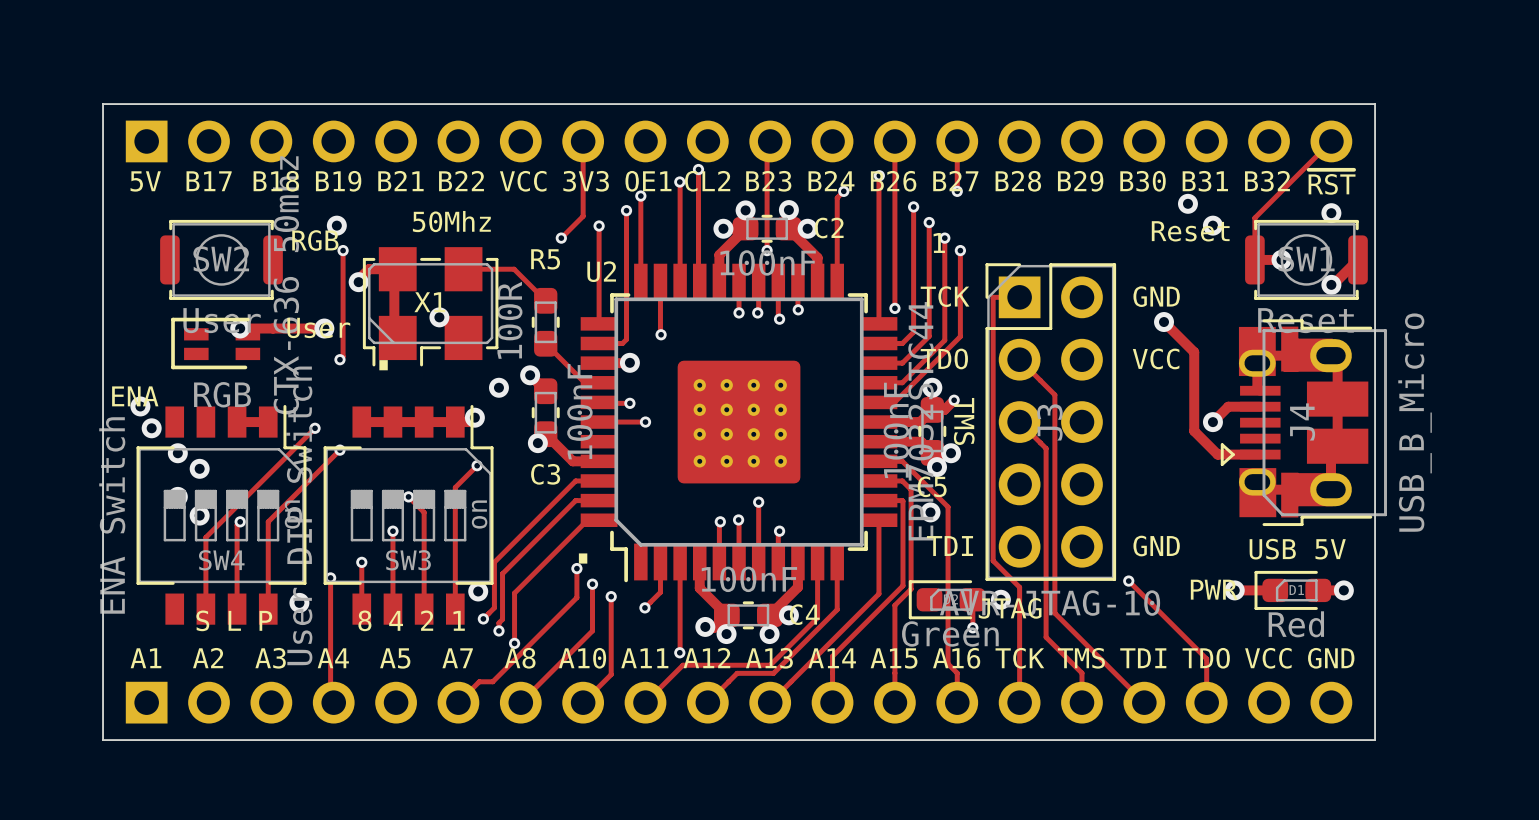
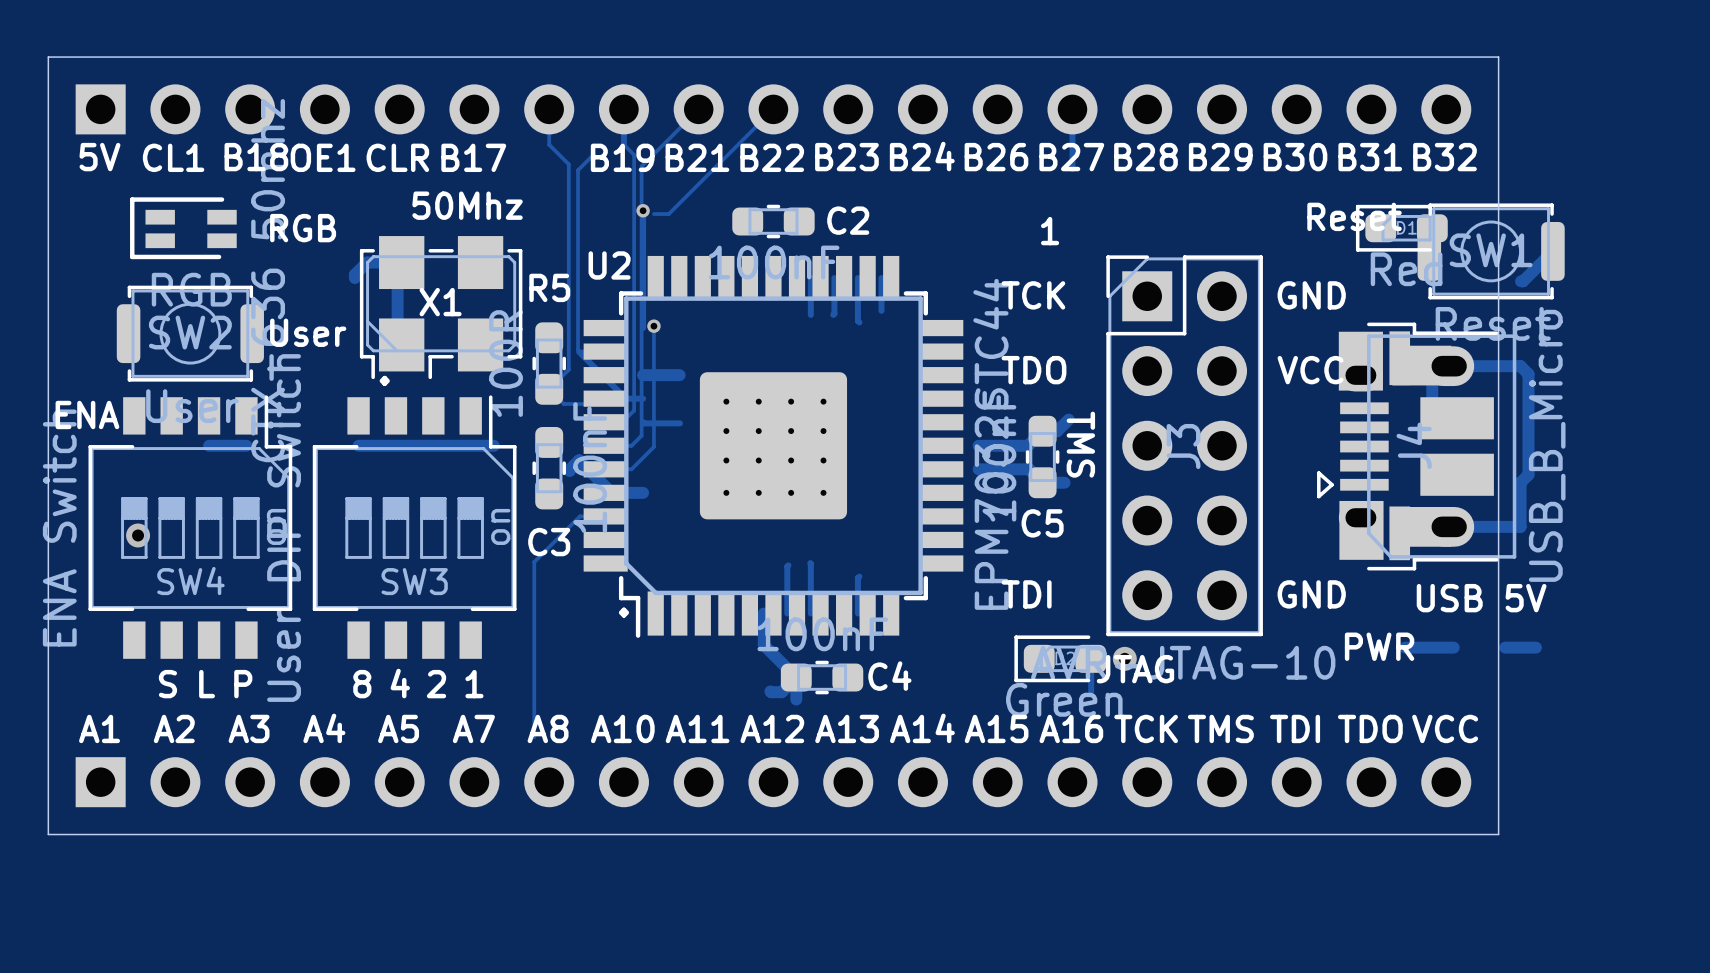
board edge: (103, 104) (1375, 104) (1375, 740) (103, 740) -> (48, 64) (48, 57) (1498, 57) (1498, 834) (48, 834) (48, 827)
track: none -> (549, 109) (549, 144) (568, 164) (568, 369) (549, 389) (563, 403) (600, 403) (605, 398)
track: none -> (698, 109) (641, 166) (641, 435) (631, 445) (605, 445)
track: none -> (773, 109) (668, 214) (653, 214)
part: none -> (773, 109)
part: (739, 141) -> none
track: (770, 141) (767, 144) (767, 250) -> none
track: (894, 141) (894, 308) -> none
track: (1331, 141) (1254, 217) (1254, 259) (1281, 259) -> none
track: (698, 169) (699, 282) -> none
via: (698, 169) -> none
track: (583, 170) (583, 216) (561, 238) -> (623, 144) (634, 154) (634, 410) (622, 422) (605, 422)
track: (879, 175) (878, 323) -> none
via: (879, 175) -> none
track: none -> (594, 154) (578, 170) (578, 349) (579, 351) (605, 351)
text: B17 (209, 181) -> CL1 (173, 157)
text position: B19 (338, 181) -> B19 (622, 157)
text: none -> CLR (397, 157)
text position: B21 (400, 181) -> B21 (697, 157)
text: B22 (461, 181) -> B17 (473, 157)
text: VCC (523, 181) -> none
text: 3V3 (586, 181) -> none
text position: OE1 (648, 181) -> OE1 (323, 157)
via: (679, 181) -> none
text: CL2 (707, 181) -> B22 (772, 157)
track: (680, 182) (680, 282) -> none
text: ~{RST} (1332, 182) -> none
track: (843, 191) (837, 197) (837, 282) -> none
via: (843, 191) -> none
via: (957, 191) -> none
track: (640, 196) (640, 282) -> none
via: (640, 196) -> none
via: (1187, 203) -> none
track: (913, 206) (913, 332) (902, 343) (878, 343) -> none
via: (913, 206) -> none
track: (626, 210) (626, 339) (622, 343) (599, 343) -> none
via: (626, 210) -> none
via: (745, 210) -> none
via: (788, 210) -> none
via: (1331, 213) -> none
track: (929, 222) (929, 336) (902, 363) (878, 363) -> none
via: (929, 222) -> none
via: (336, 225) -> none
via: (1212, 225) -> none
via: (723, 228) -> none
track: (745, 228) (719, 254) (719, 282) -> none
C2 position: (767, 228) -> (773, 221)
track: (788, 228) (817, 257) (817, 282) -> none
via: (807, 228) -> none
via: (561, 238) -> none
track: (944, 238) (944, 340) (902, 382) (878, 382) -> none
via: (944, 238) -> none
track: (343, 250) (343, 356) (339, 359) -> none
via: (343, 250) -> none
via: (767, 250) -> none
track: (960, 250) (960, 336) (894, 402) (878, 402) -> none
via: (960, 250) -> none
SW2 position: (221, 259) -> (190, 333)
via: (1281, 259) -> none
track: (463, 269) (514, 269) (545, 300) -> none
via: (358, 282) -> none
track: (660, 282) (661, 334) -> none
via: (1331, 284) -> none
text position: TCK (945, 296) -> TCK (1033, 295)
track: (1019, 297) (993, 297) (993, 560) (1019, 587) (1019, 702) -> none
via: (894, 308) -> none
via: (798, 309) -> none
via: (739, 312) -> none
via: (757, 312) -> none
via: (439, 317) -> none
via: (779, 319) -> none
R5 position: (545, 322) -> (549, 363)
track: none -> (653, 326) (653, 446) (631, 469) (605, 469)
via: none -> (653, 326)
track: (1164, 322) (1194, 352) (1194, 431) (1217, 454) (1260, 454) -> none
via: (1164, 322) -> none
track: (240, 328) (324, 328) -> none
via: (240, 328) -> none
via: (324, 328) -> none
via: (661, 334) -> none
part position: (215, 343) -> (183, 228)
text position: TDO (944, 358) -> TDO (1033, 370)
via: (339, 359) -> none
track: (1019, 359) (1054, 394) (1054, 613) (1144, 702) -> none
via: (629, 362) -> none
via: (530, 375) -> none
via: (498, 387) -> none
via: (932, 387) -> none
via: (954, 400) -> none
via: (629, 403) -> none
via: (140, 406) -> none
track: (1260, 406) (1228, 406) (1212, 422) -> none
C3 position: (545, 412) -> (549, 468)
via: (474, 417) -> none
track: (599, 422) (645, 422) -> none
via: (645, 422) -> none
U2 position: (739, 422) -> (773, 446)
track: (1019, 422) (1046, 448) (1046, 637) (1081, 673) (1081, 702) -> none
via: (1212, 422) -> none
J4 position: (1303, 422) -> (1416, 446)
via: (151, 428) -> none
track: (315, 428) (205, 537) (205, 609) -> none
via: (315, 428) -> none
via: (537, 443) -> none
track: (339, 450) (268, 521) (268, 609) -> none
via: (339, 450) -> none
via: (177, 453) -> none
via: (951, 453) -> none
track: (878, 461) (902, 461) (948, 507) (948, 663) (957, 673) (957, 702) -> none
track: (477, 465) (455, 487) (455, 609) -> none
via: (477, 465) -> none
via: (937, 467) -> none
via: (199, 468) -> none
track: none -> (605, 516) (579, 516) (534, 562) (534, 737)
track: (599, 480) (575, 480) (494, 562) (494, 607) (483, 618) -> none
track: (878, 480) (902, 480) (911, 489) (911, 589) (894, 605) (894, 702) -> none
track: (408, 496) (424, 512) (424, 609) -> none
via: (408, 496) -> none
track: (599, 500) (575, 500) (502, 573) (502, 619) (498, 623) (498, 630) -> none
track: (760, 500) (758, 502) (758, 561) -> none
track: (878, 500) (902, 501) (902, 585) (832, 656) (832, 702) -> none
via: (758, 502) -> none
via: (930, 512) -> none
SW4 position: (221, 514) -> (190, 527)
SW3 position: (408, 514) -> (414, 527)
via: (199, 515) -> none
via: (738, 519) -> none
track: (599, 520) (587, 520) (514, 593) (514, 643) -> none
track: (878, 520) (878, 593) (770, 702) -> none
track: (240, 521) (237, 524) (237, 609) -> none
via: (240, 521) -> none
via: (720, 521) -> none
track: (392, 531) (392, 609) -> none
via: (392, 531) -> none
via: (779, 531) -> none
text position: TDI (949, 546) -> TDI (1026, 594)
track: (660, 561) (660, 592) (644, 607) -> none
track: (680, 561) (680, 652) -> none
track: (797, 561) (797, 587) (769, 615) -> none
track: (817, 561) (817, 617) (770, 665) (682, 665) (645, 702) -> none
track: (837, 561) (837, 609) (773, 673) (737, 673) (707, 702) -> none
track: (361, 562) (361, 609) -> none
via: (361, 562) -> none
track: (576, 568) (576, 597) (492, 681) (479, 681) (458, 702) -> none
via: (576, 568) -> none
track: (330, 577) (330, 699) (333, 702) -> none
via: (330, 577) -> none
track: (1128, 581) (1206, 659) (1206, 702) -> none
via: (1128, 581) -> none
track: (592, 584) (592, 630) (520, 702) -> none
via: (592, 584) -> none
via: (1234, 590) -> none
D1 position: (1292, 590) -> (1401, 228)
via: (1343, 590) -> none
via: (478, 591) -> none
track: (611, 596) (611, 674) (583, 702) -> none
via: (611, 596) -> none
via: (299, 602) -> none
via: (644, 607) -> none
via: (788, 615) -> none
via: (483, 618) -> none
via: (705, 626) -> none
via: (972, 627) -> none
via: (498, 630) -> none
via: (726, 634) -> none
via: (769, 634) -> none
via: (514, 643) -> none
via: (679, 652) -> none
text: GND (1331, 658) -> none
part: none -> (773, 782)
part: (739, 702) -> none

